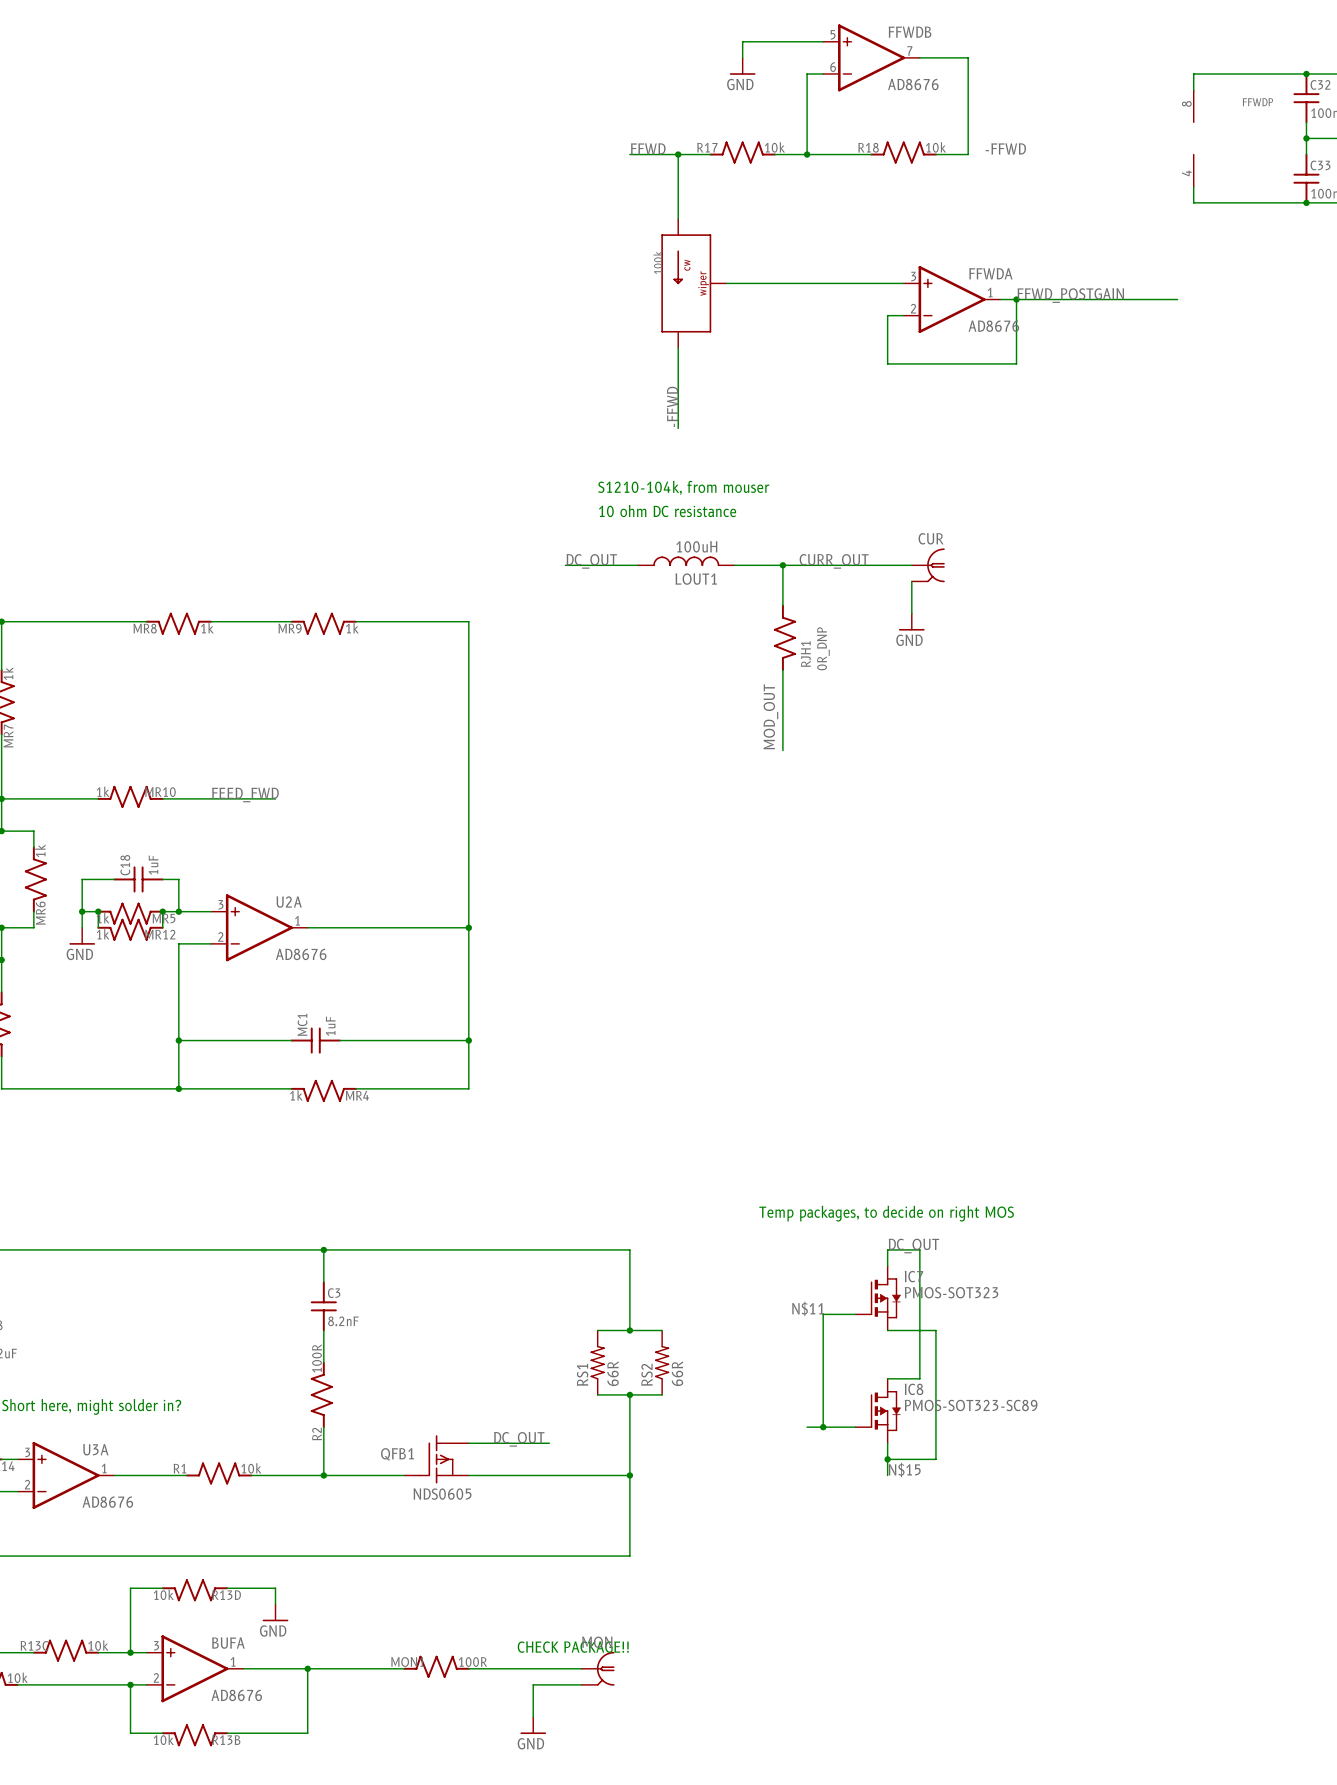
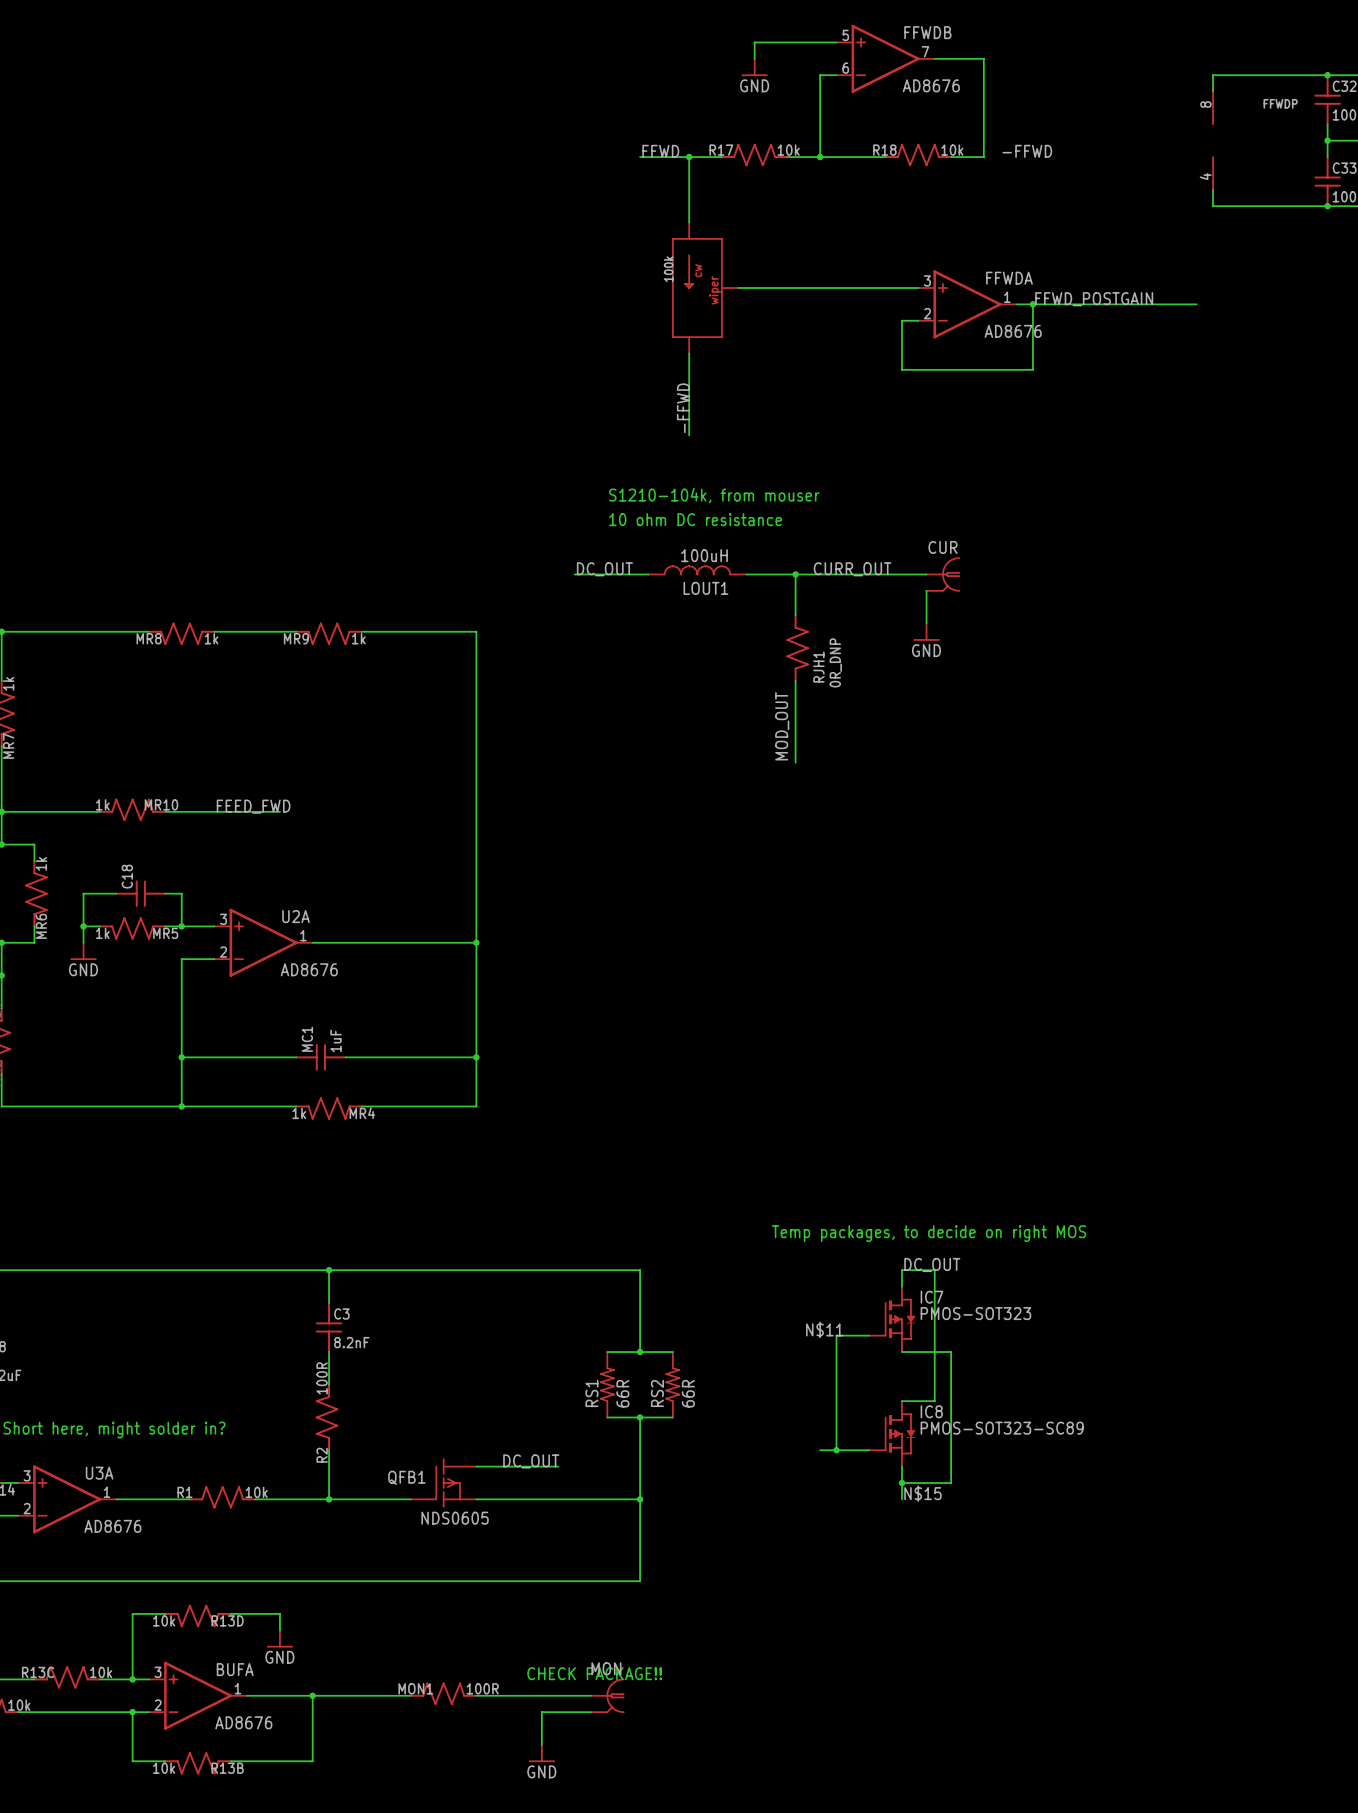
C18 value: 1uF (153, 865) -> none
wire: (98, 911) (98, 927) -> none
junction: (98, 911) -> none
wire: (162, 911) (162, 927) -> none
junction: (162, 911) -> none
MR12: 1k (130, 929) -> none

